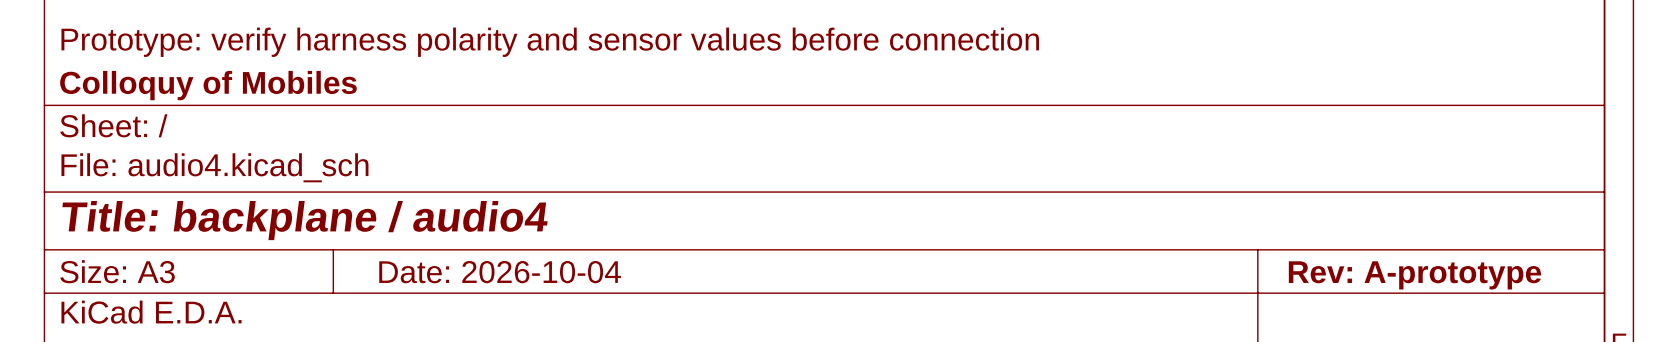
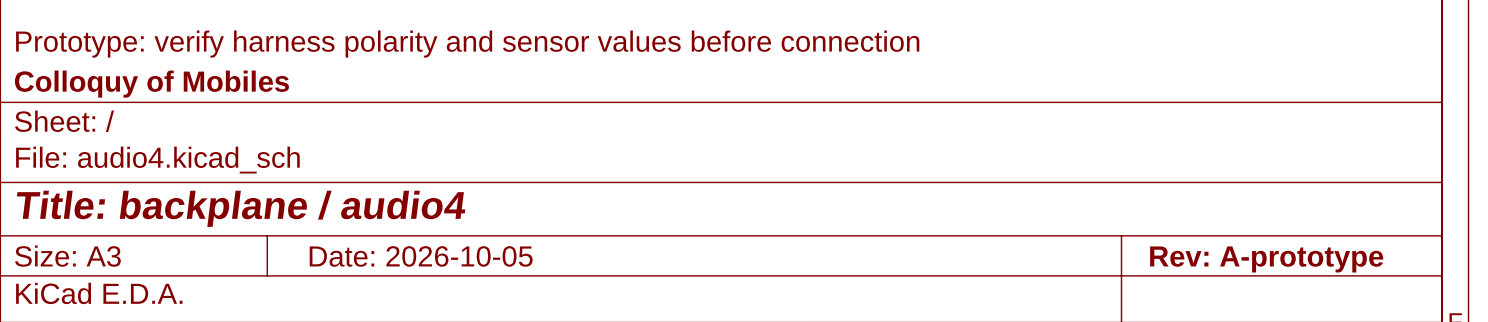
title block: Date: 2026-10-04 (500, 272) -> Date: 2026-10-05 (421, 256)

